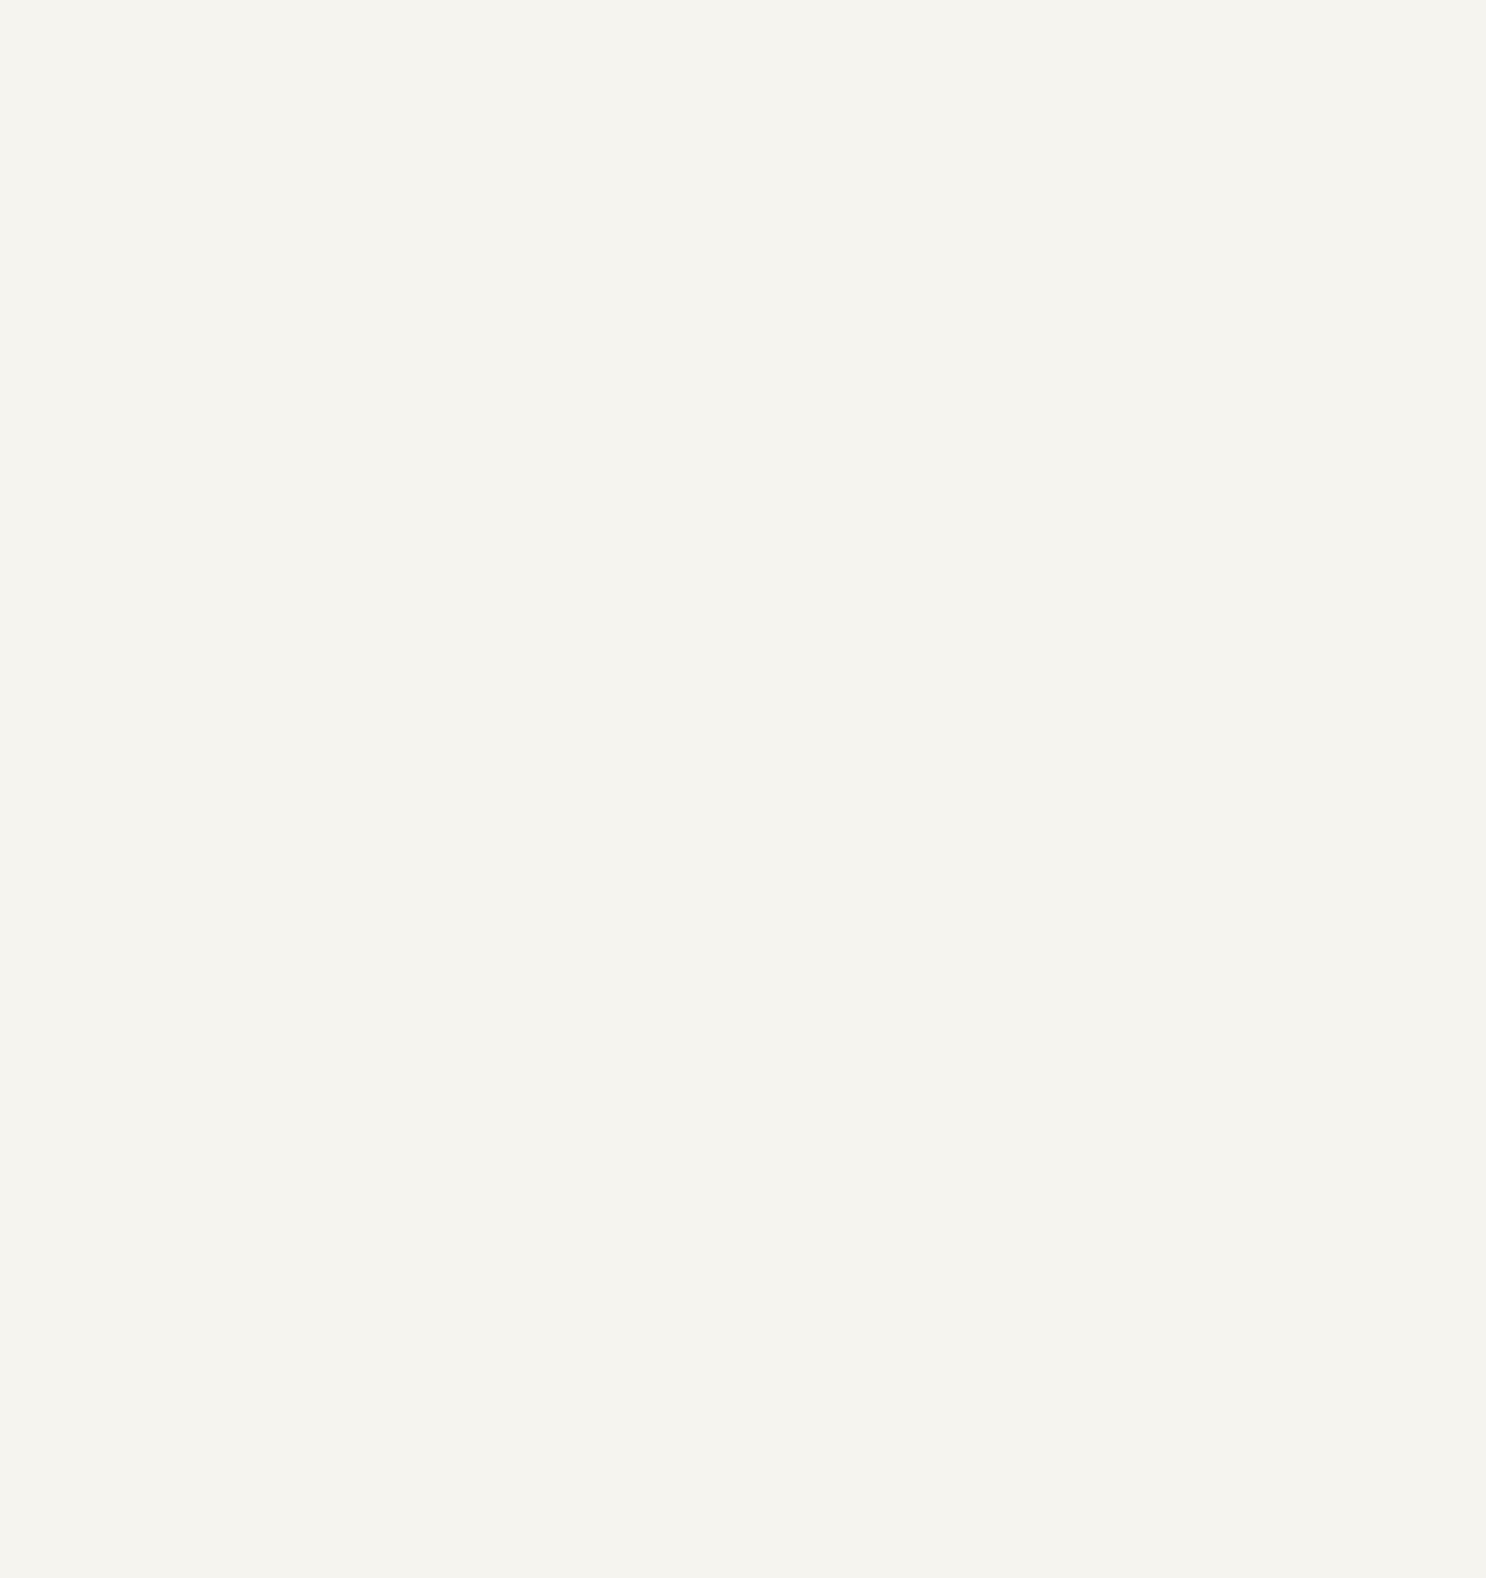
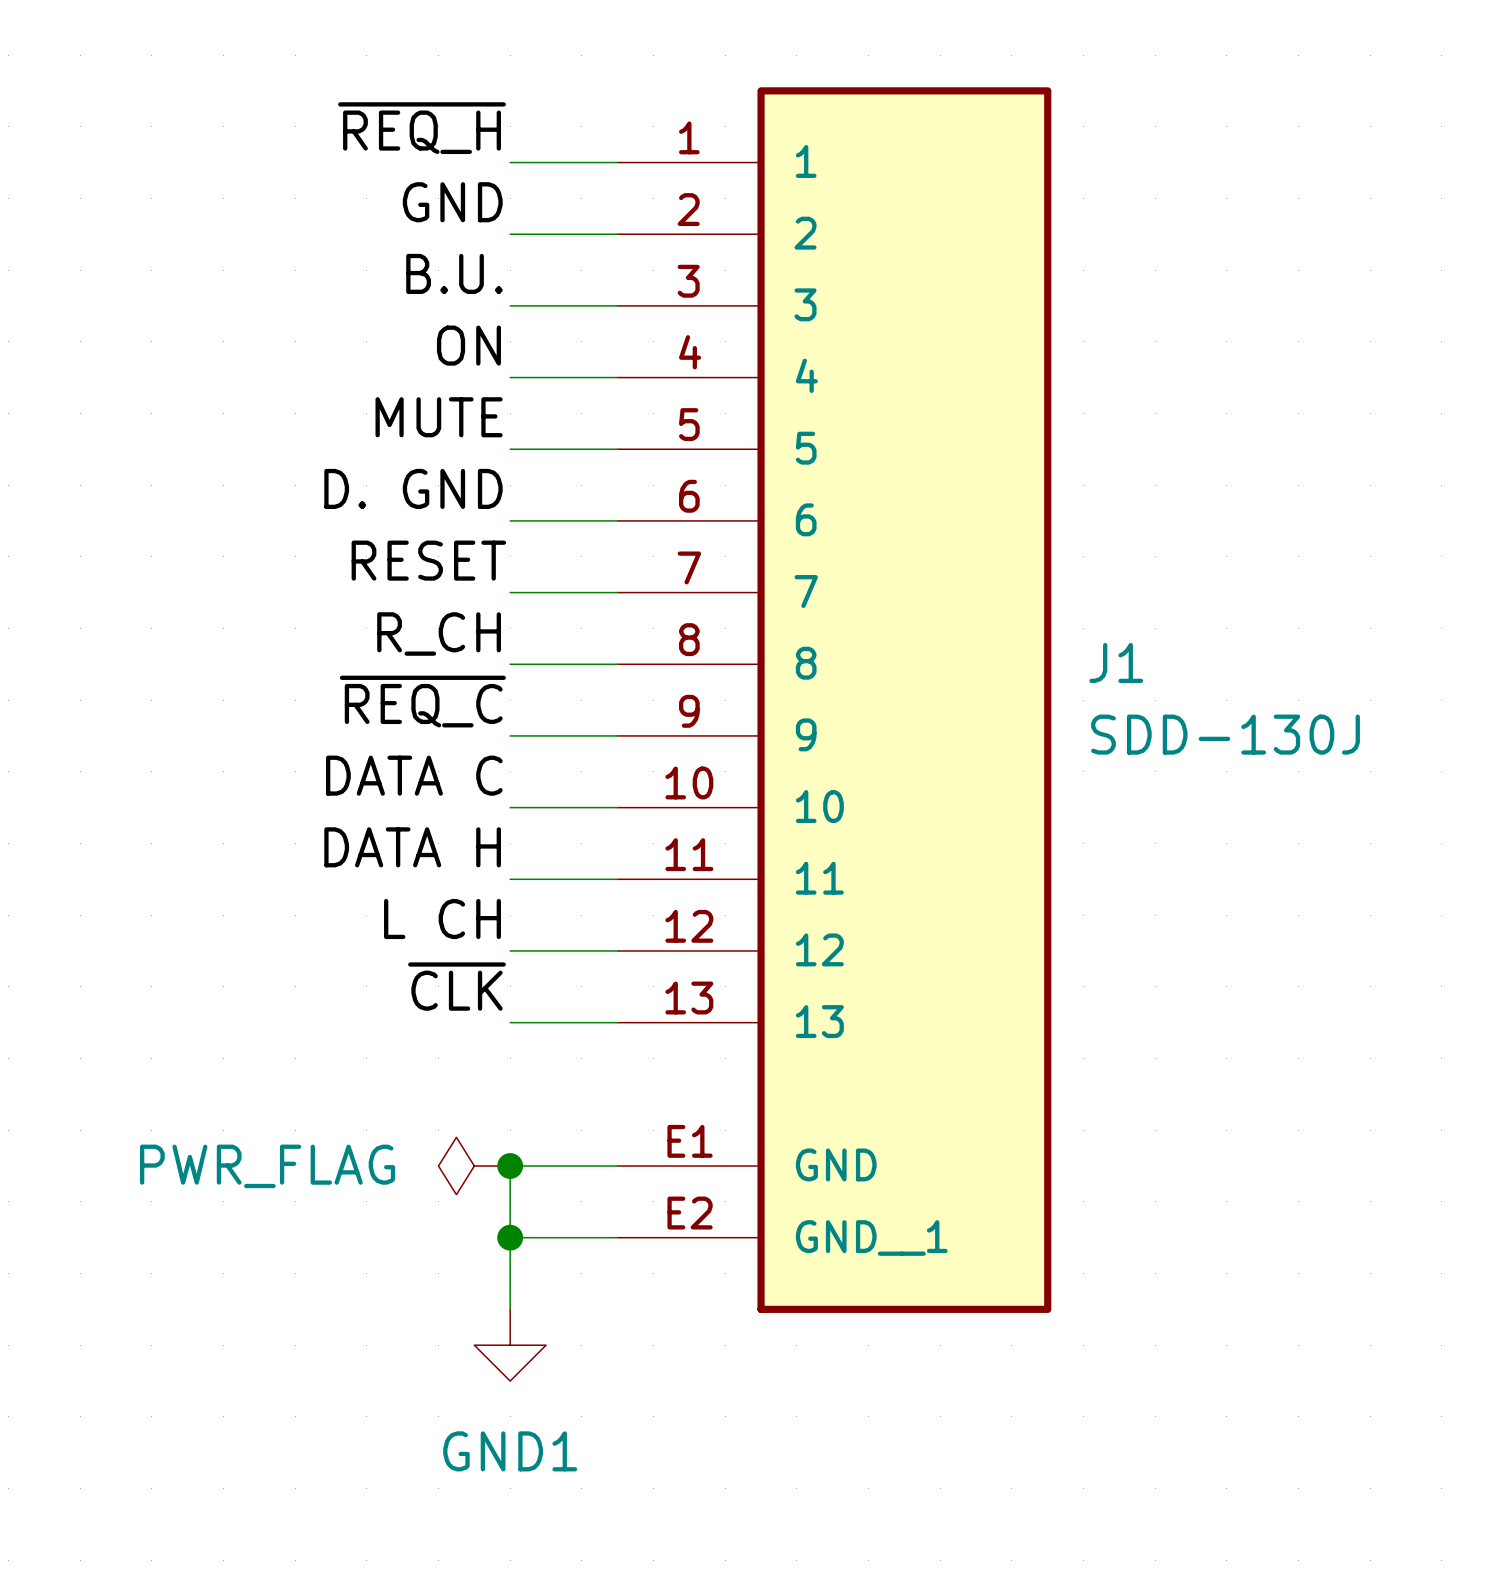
label: none -> ~{REQ_H} (422, 128)
wire: none -> (510, 162) (617, 162)
label: none -> GND (452, 202)
wire: none -> (510, 234) (617, 234)
label: none -> B.U. (454, 273)
wire: none -> (510, 305) (617, 305)
label: none -> ON (468, 345)
wire: none -> (510, 377) (617, 377)
label: none -> MUTE (439, 417)
wire: none -> (510, 449) (617, 449)
label: none -> D. GND (413, 488)
wire: none -> (510, 520) (617, 520)
label: none -> RESET (428, 560)
wire: none -> (510, 592) (617, 592)
label: none -> R_CH (439, 634)
wire: none -> (510, 664) (617, 664)
J1: none -> SDD-130J (834, 700)
label: none -> ~{REQ_C} (422, 701)
wire: none -> (510, 735) (617, 735)
label: none -> DATA C (414, 775)
wire: none -> (510, 807) (617, 807)
label: none -> DATA H (412, 847)
wire: none -> (510, 879) (617, 879)
label: none -> L CH (442, 919)
wire: none -> (510, 950) (617, 950)
label: none -> ~{CLK} (457, 986)
wire: none -> (510, 1022) (617, 1022)
power symbol: none -> PWR_FLAG (474, 1166)
junction: none -> (510, 1166)
wire: none -> (617, 1166) (510, 1166) (510, 1309)
wire: none -> (510, 1237) (617, 1237)
junction: none -> (510, 1237)
power symbol: none -> GND1 (510, 1345)

